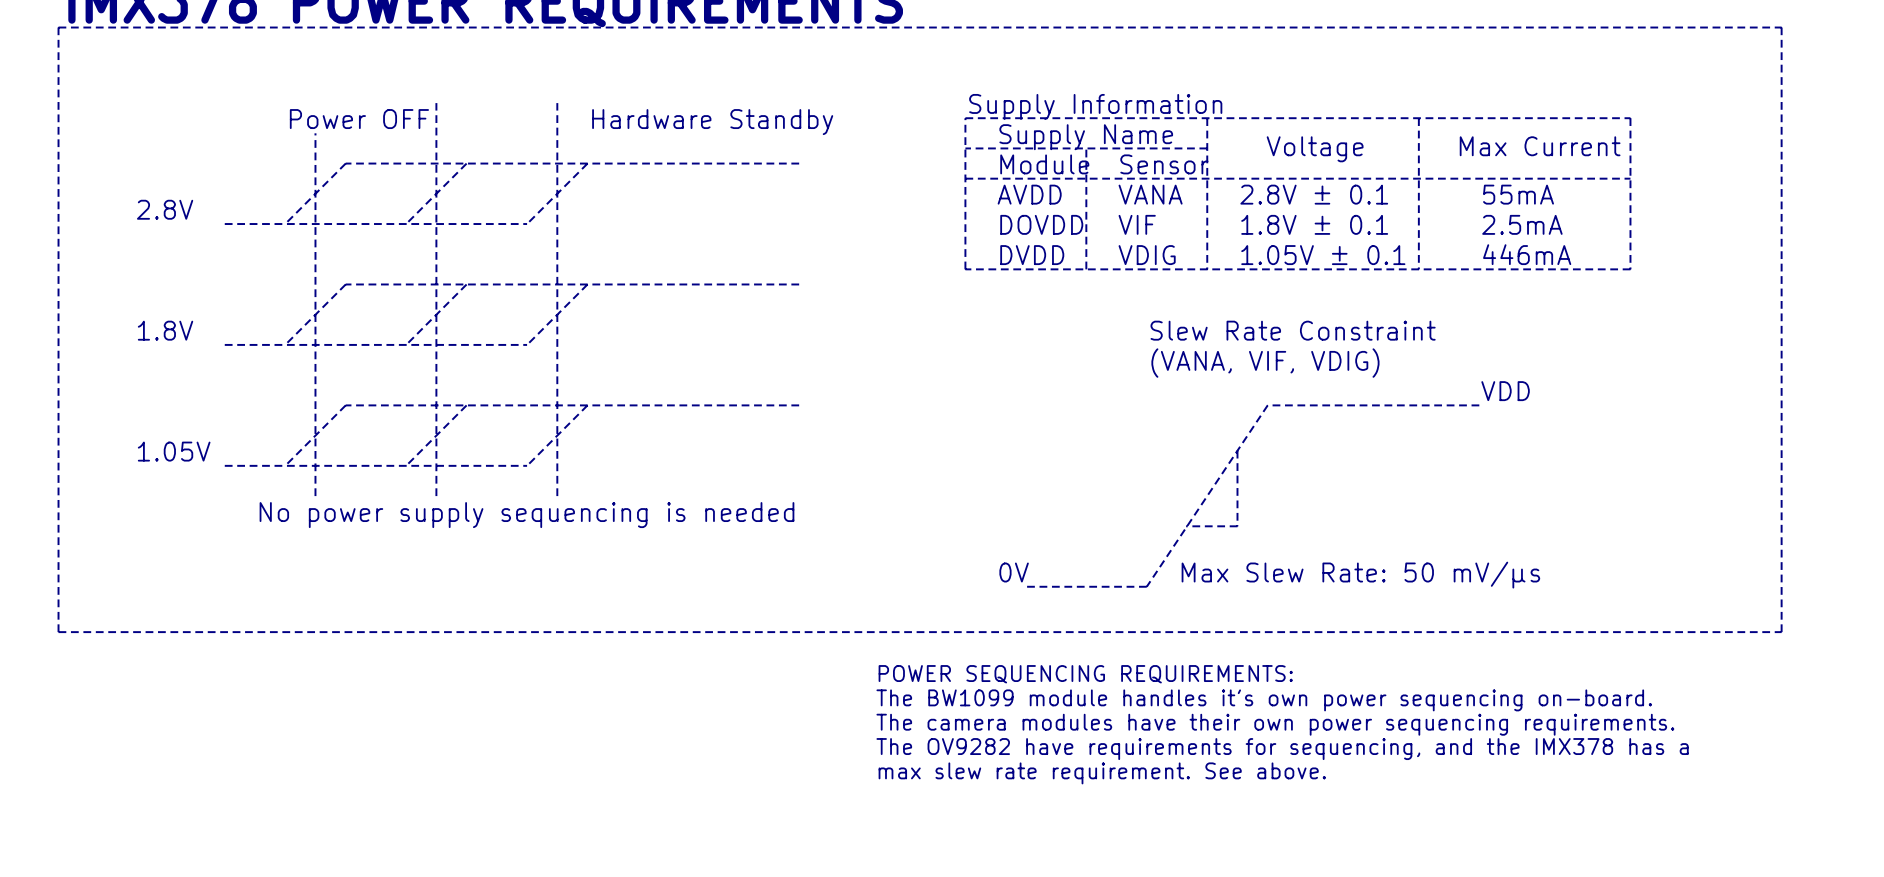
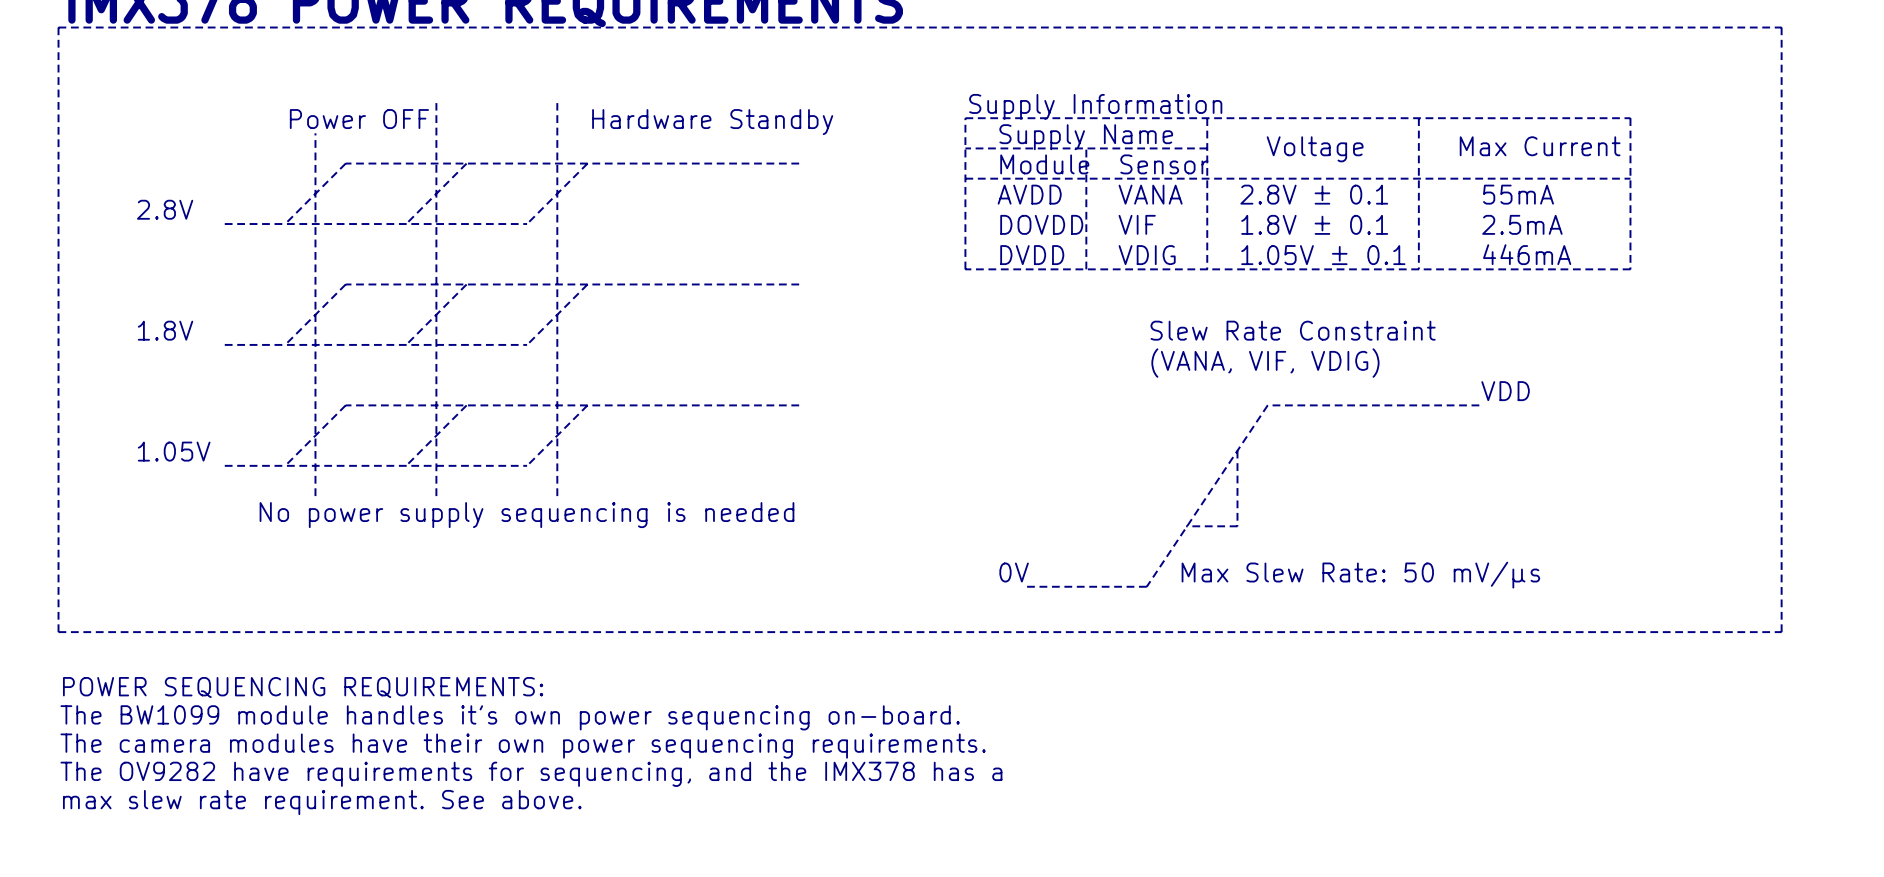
text: POWER SEQUENCING REQUIREMENTS: (1085, 674) -> none
text: none -> POWER SEQUENCING REQUIREMENTS: (303, 687)
text: The BW1099 module handles it's own power sequencing on-board. (1264, 700) -> none
text: none -> The BW1099 module handles it's own power sequencing on-board. (510, 717)
text: The camera modules have their own power sequencing requirements. (1275, 724) -> none
text: none -> The camera modules have their own power sequencing requirements. (523, 746)
text: The OV9282 have requirements for sequencing, and the IMX378 has a (1282, 749) -> none
text: max slew rate requirement. See above. (1102, 773) -> none
text: none -> The OV9282 have requirements for sequencing, and the IMX378 has a (531, 774)
text: none -> max slew rate requirement. See above. (322, 802)

